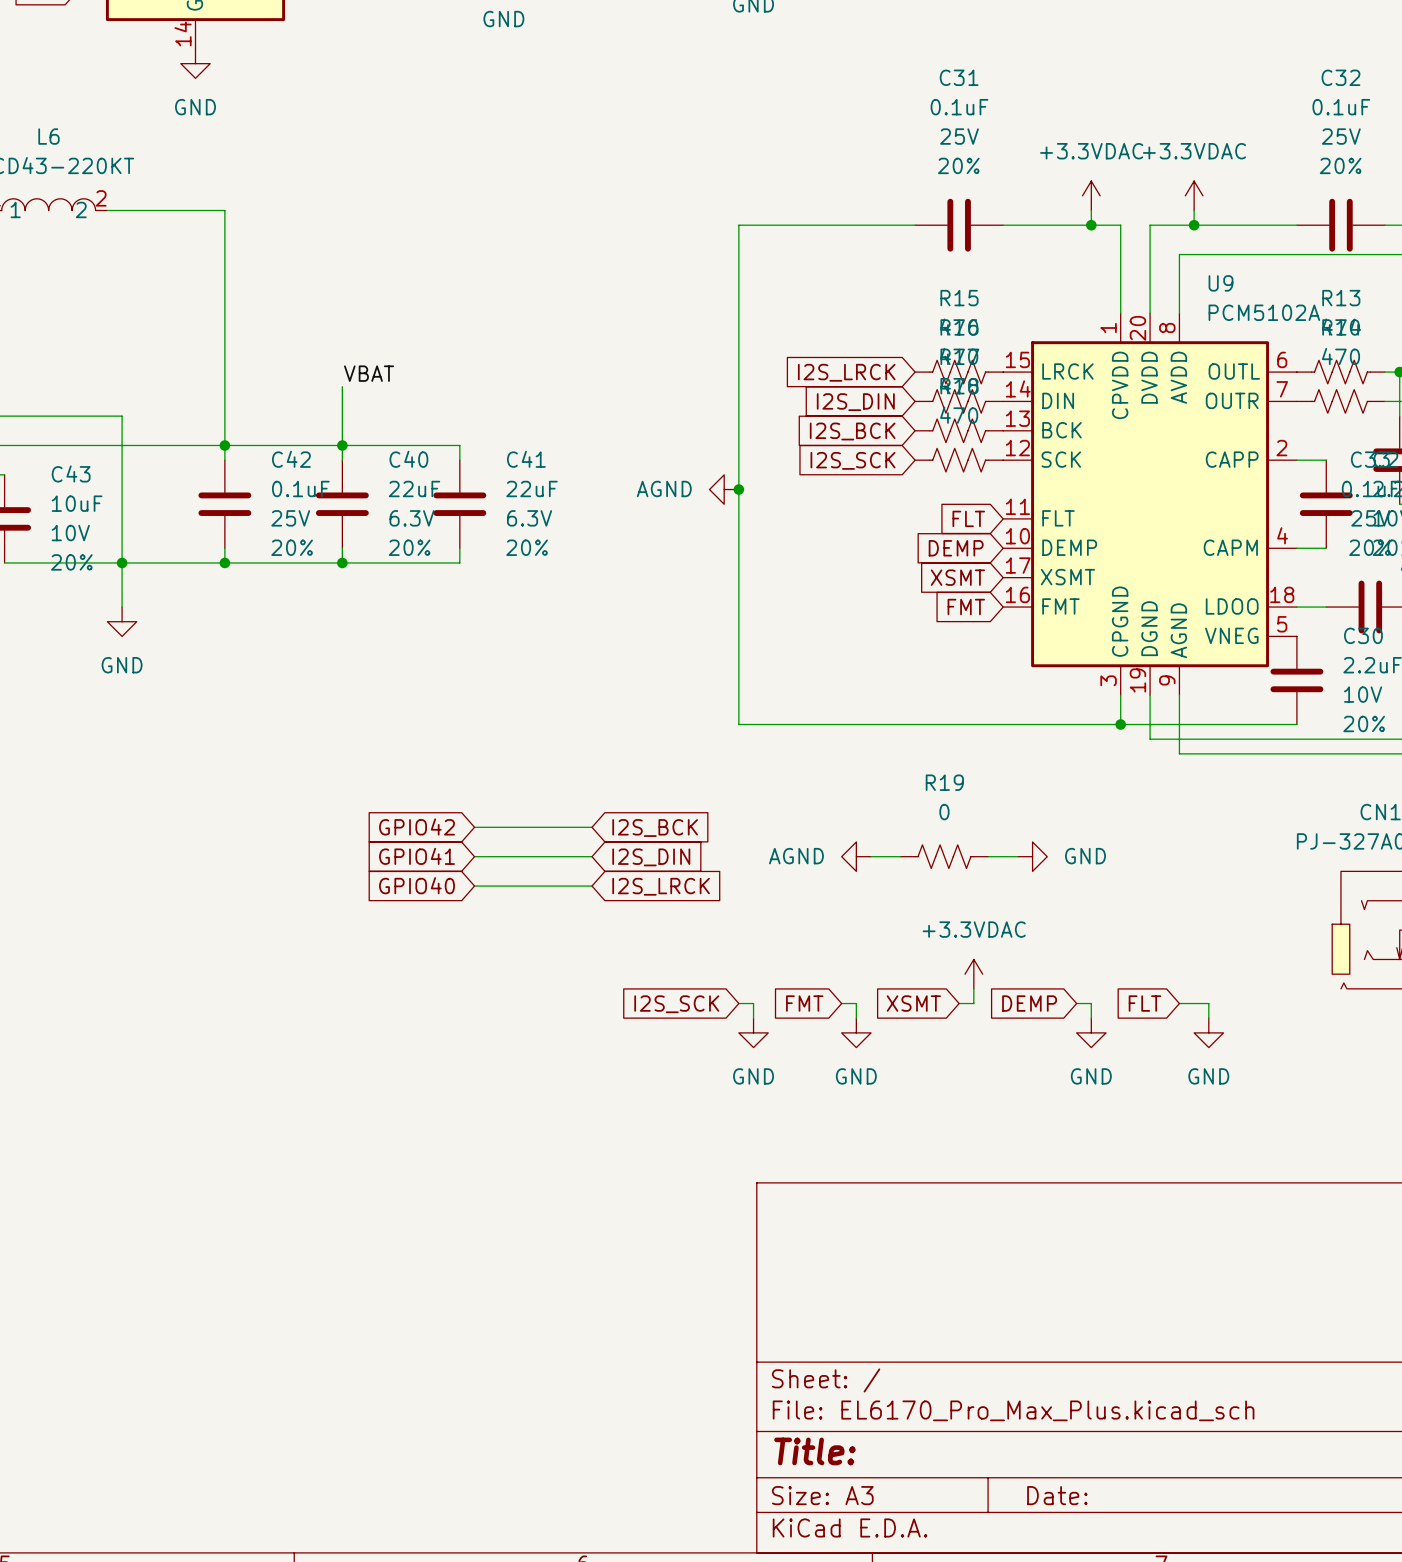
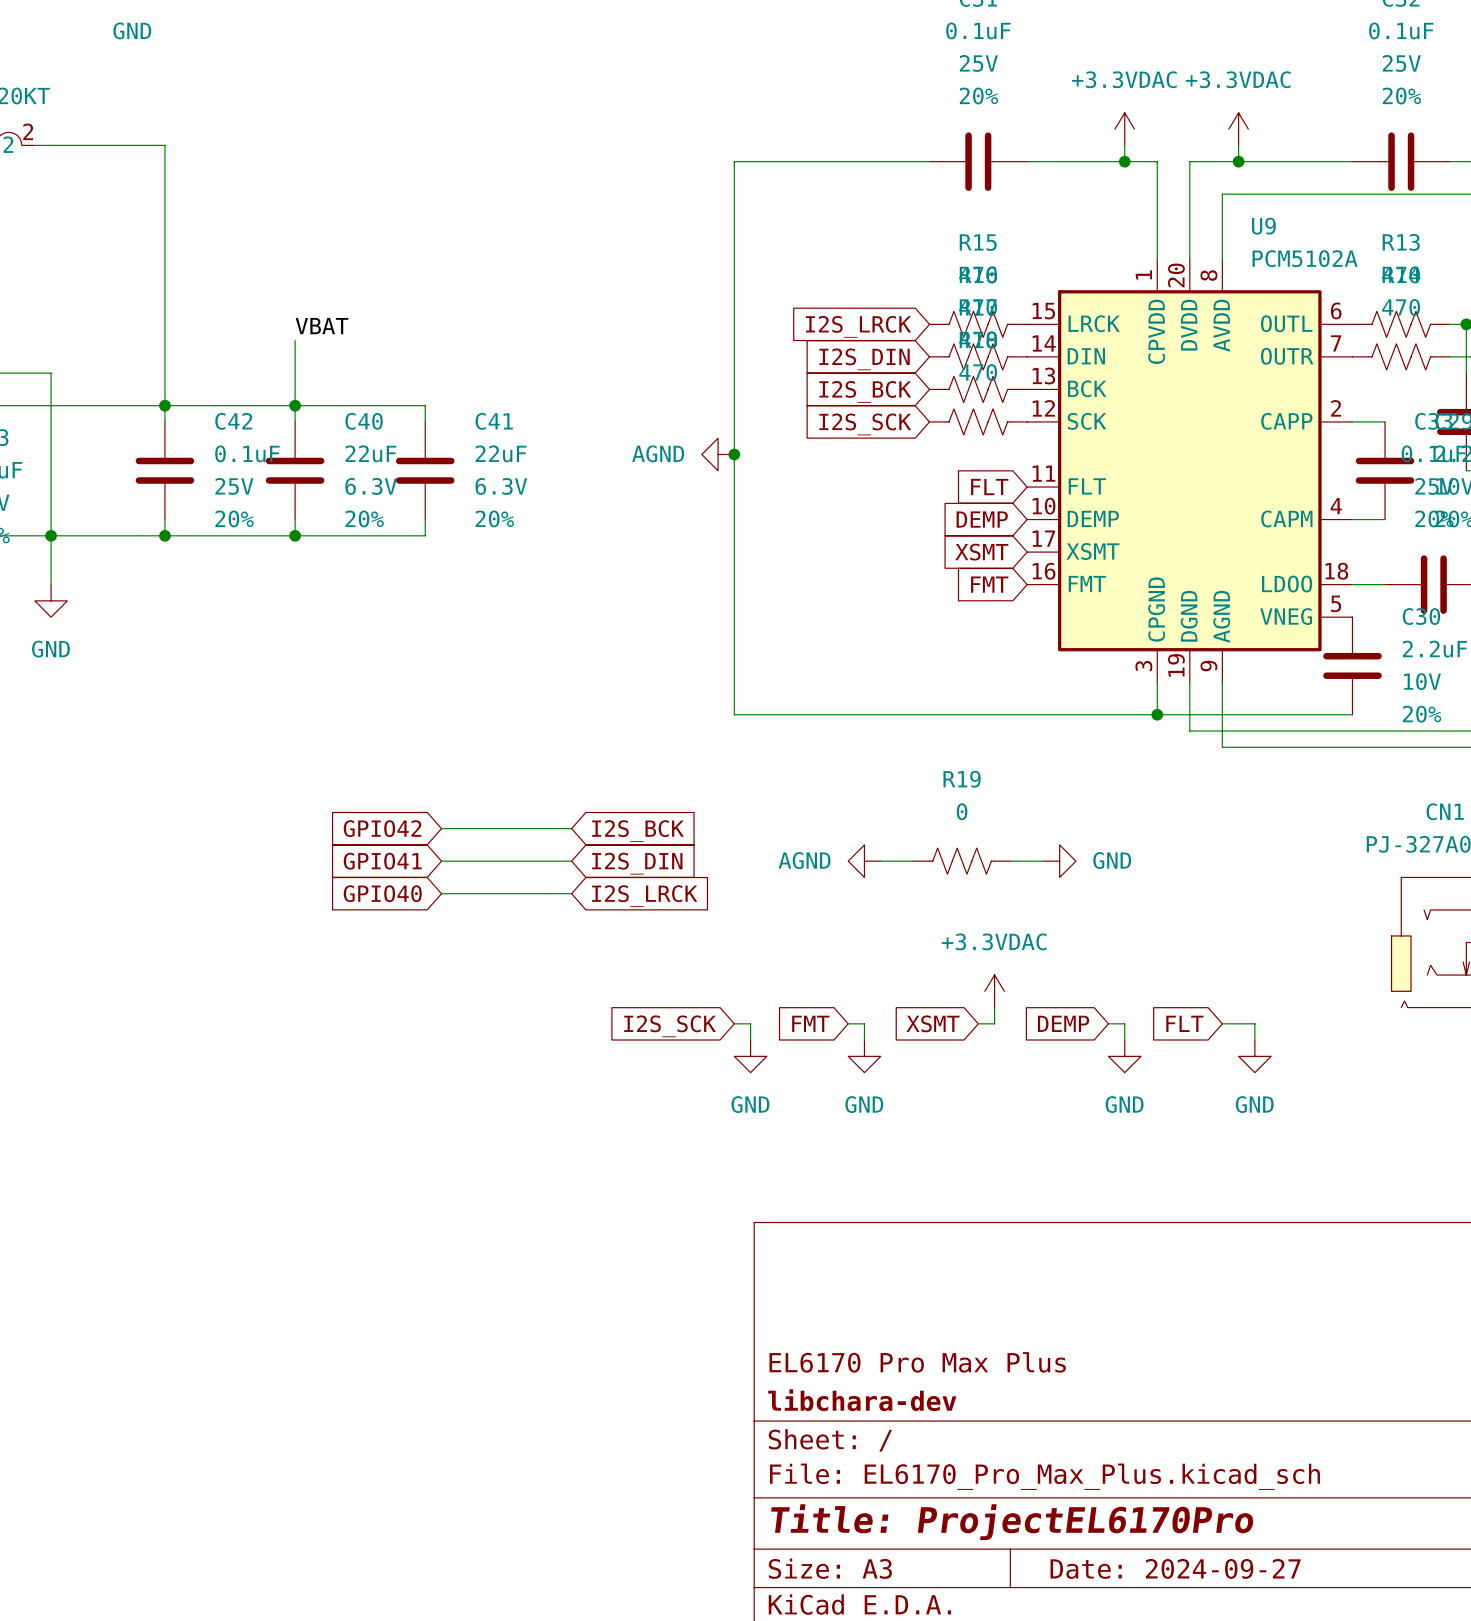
title block: none -> EL6170 Pro Max Plus (917, 1362)
title block: none -> libchara-dev (862, 1400)
title block: Title: (814, 1451) -> Title: ProjectEL6170Pro (1012, 1522)
title block: Date: (1057, 1495) -> Date: 2024-09-27 (1175, 1568)

